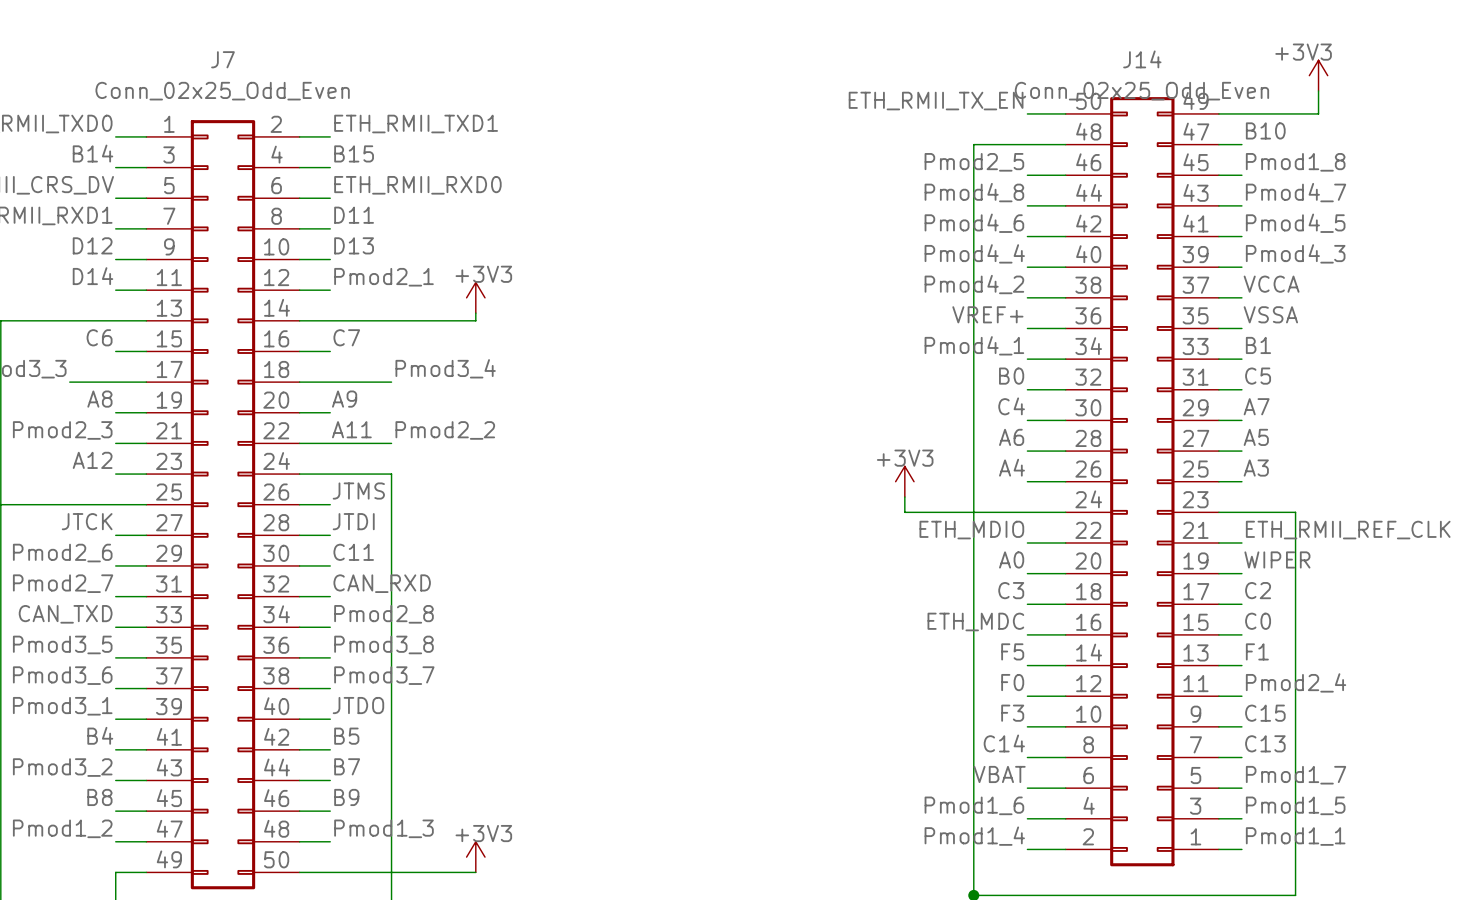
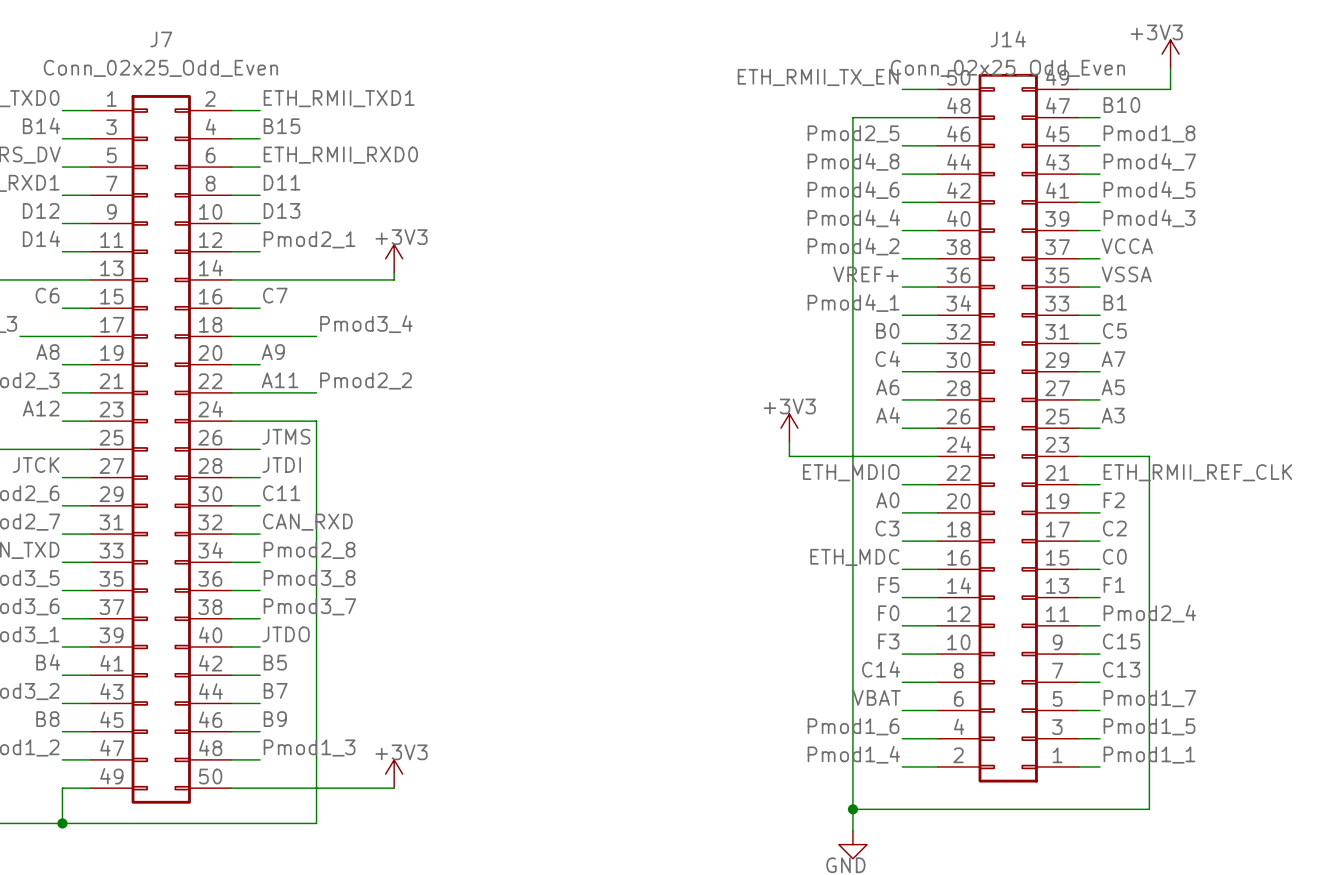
label: WIPER (1277, 559) -> F2 (1114, 500)

